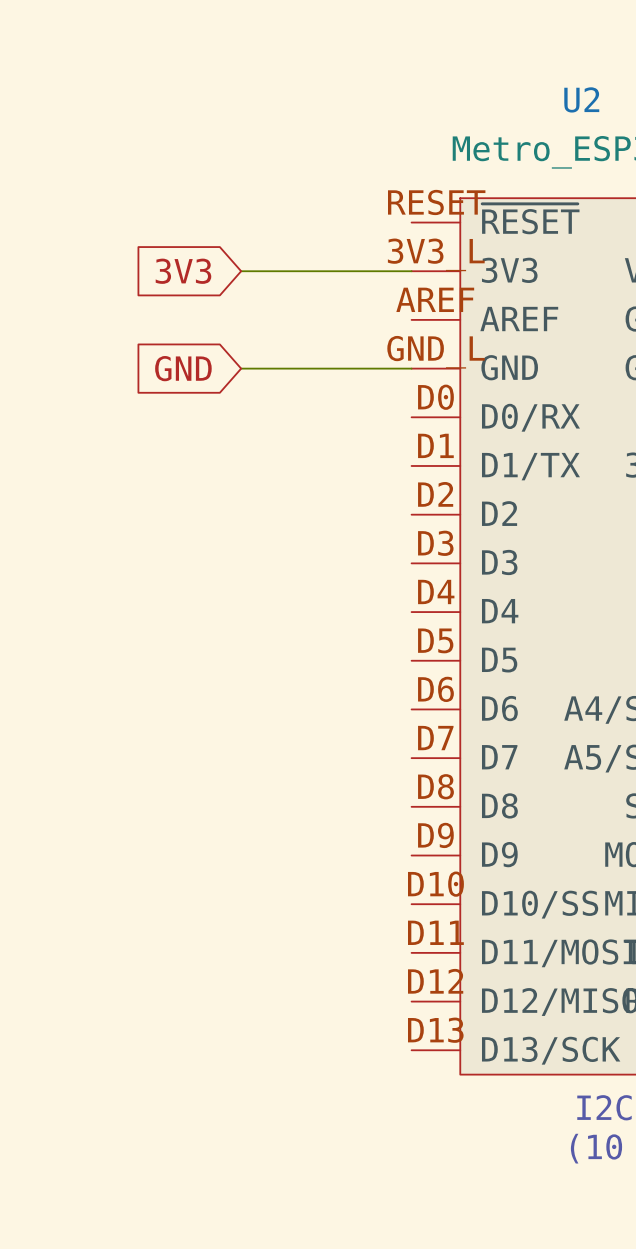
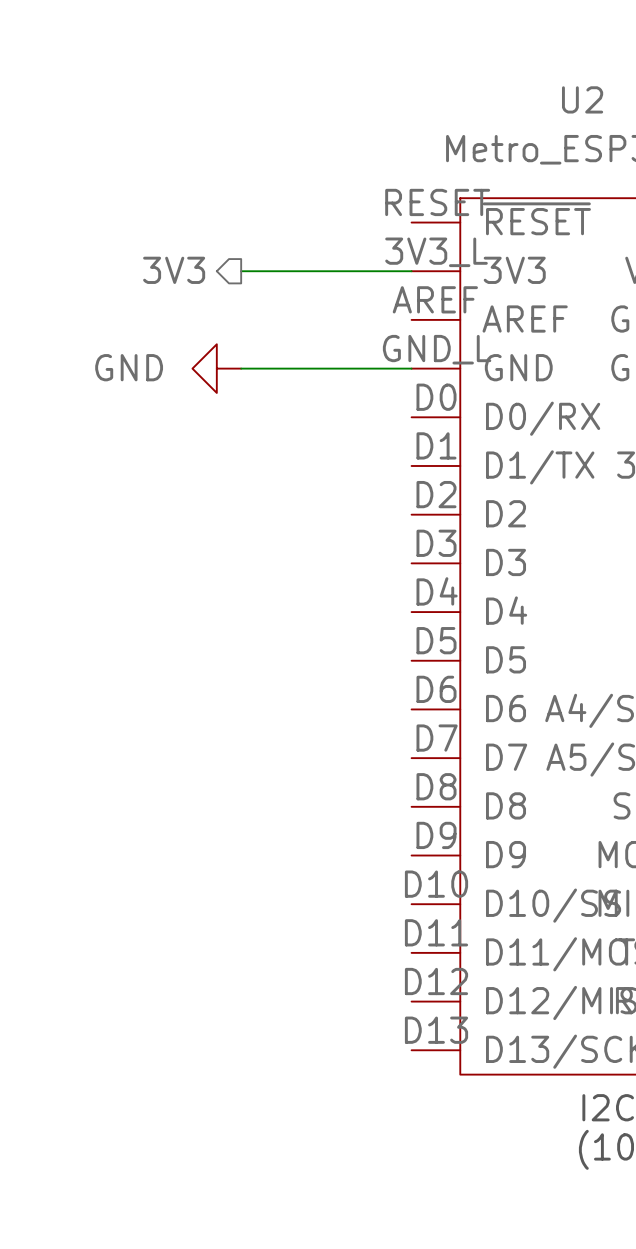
hierarchical label: none -> 3V3 (174, 270)
global label: 3V3 (183, 271) -> none
global label: GND (183, 368) -> none
power symbol: none -> GND (216, 368)

